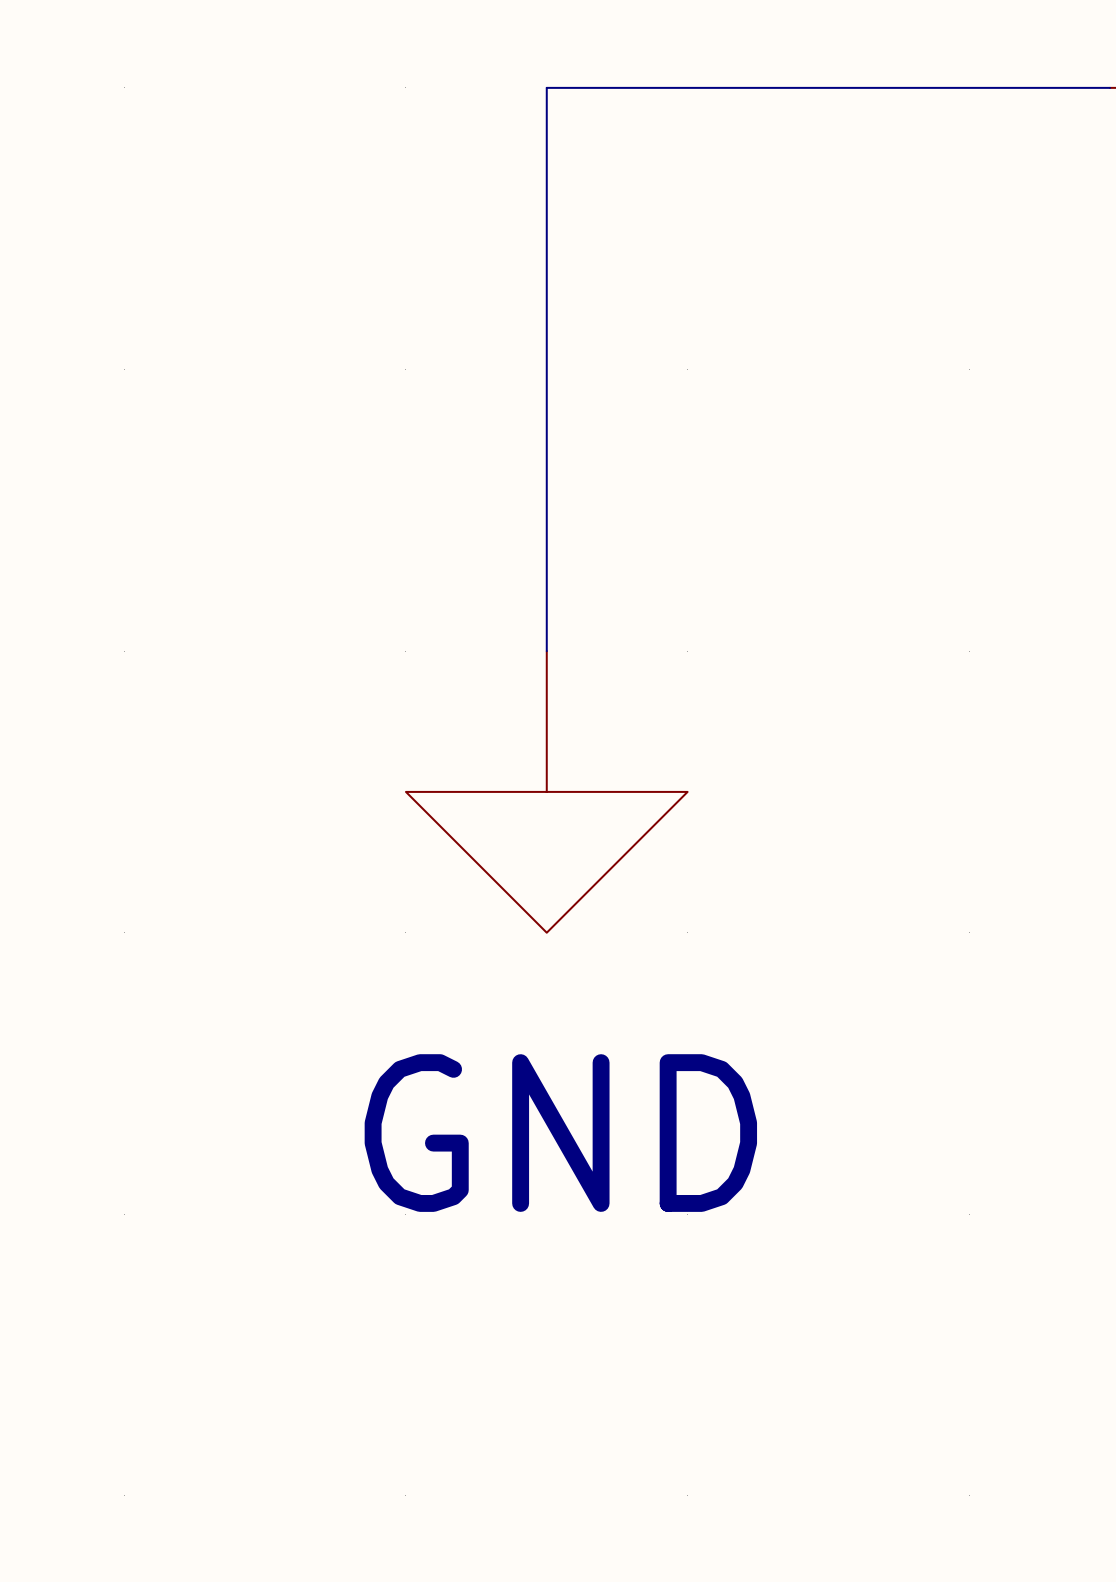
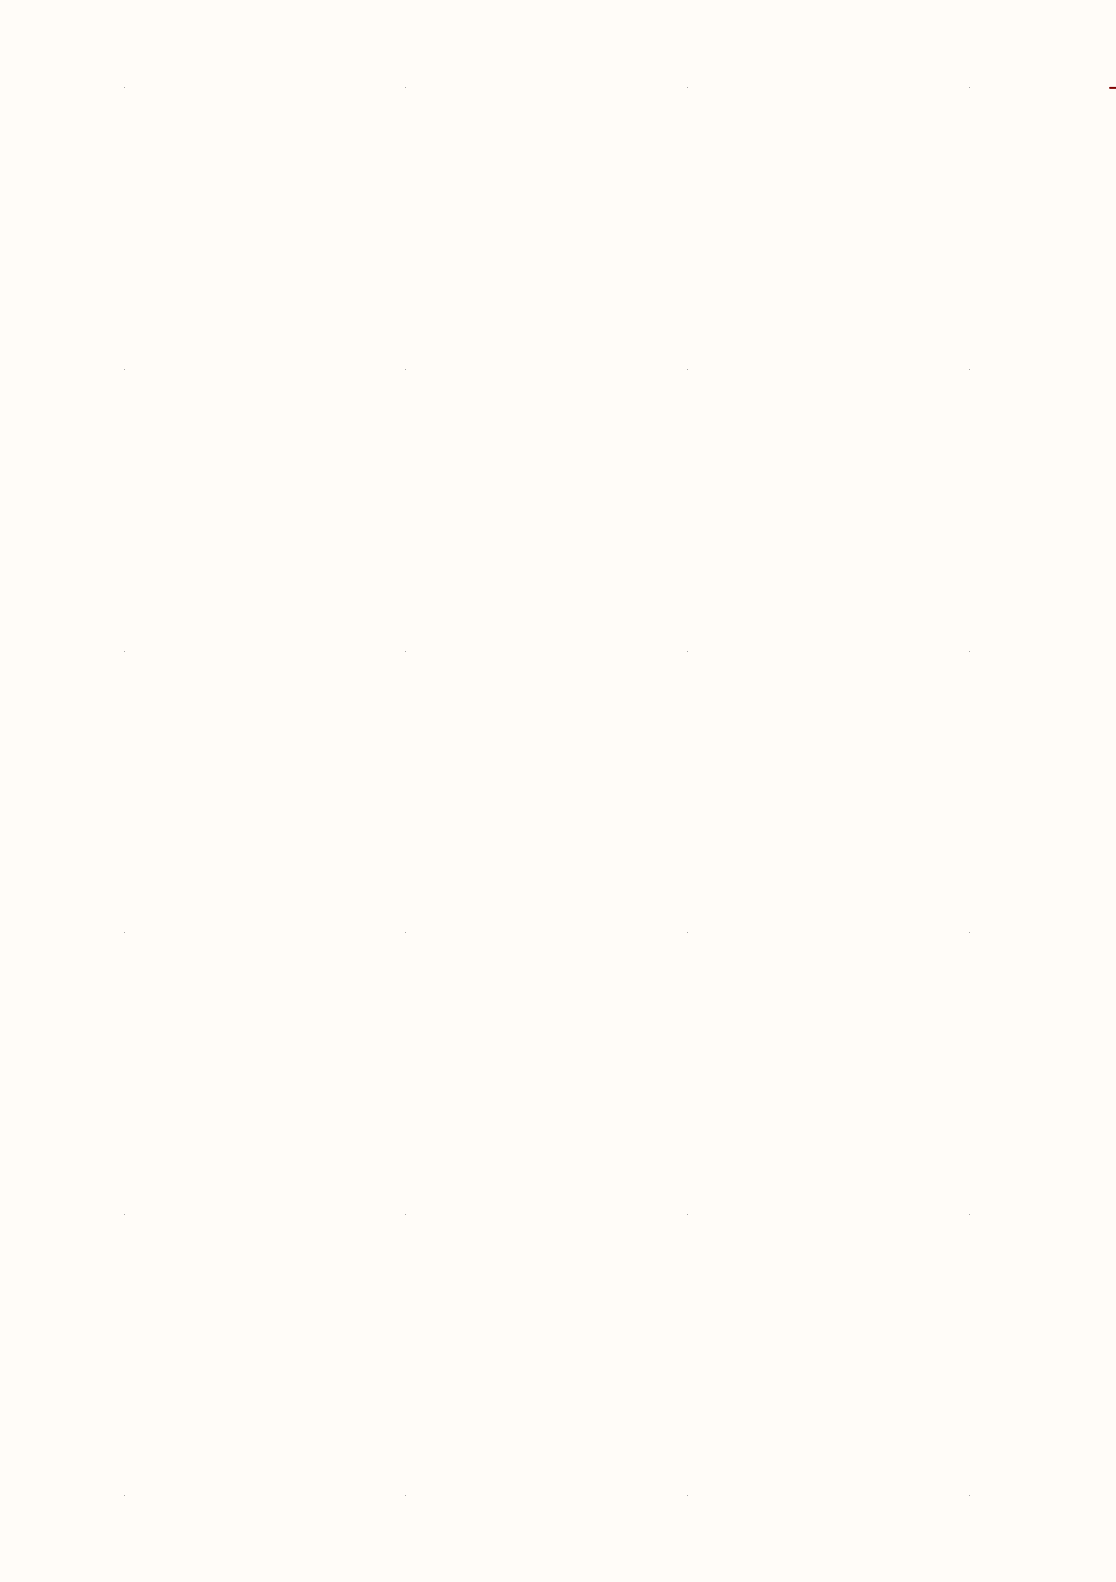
wire: (1110, 87) (546, 87) (546, 651) -> none
power symbol: GND (546, 791) -> none

